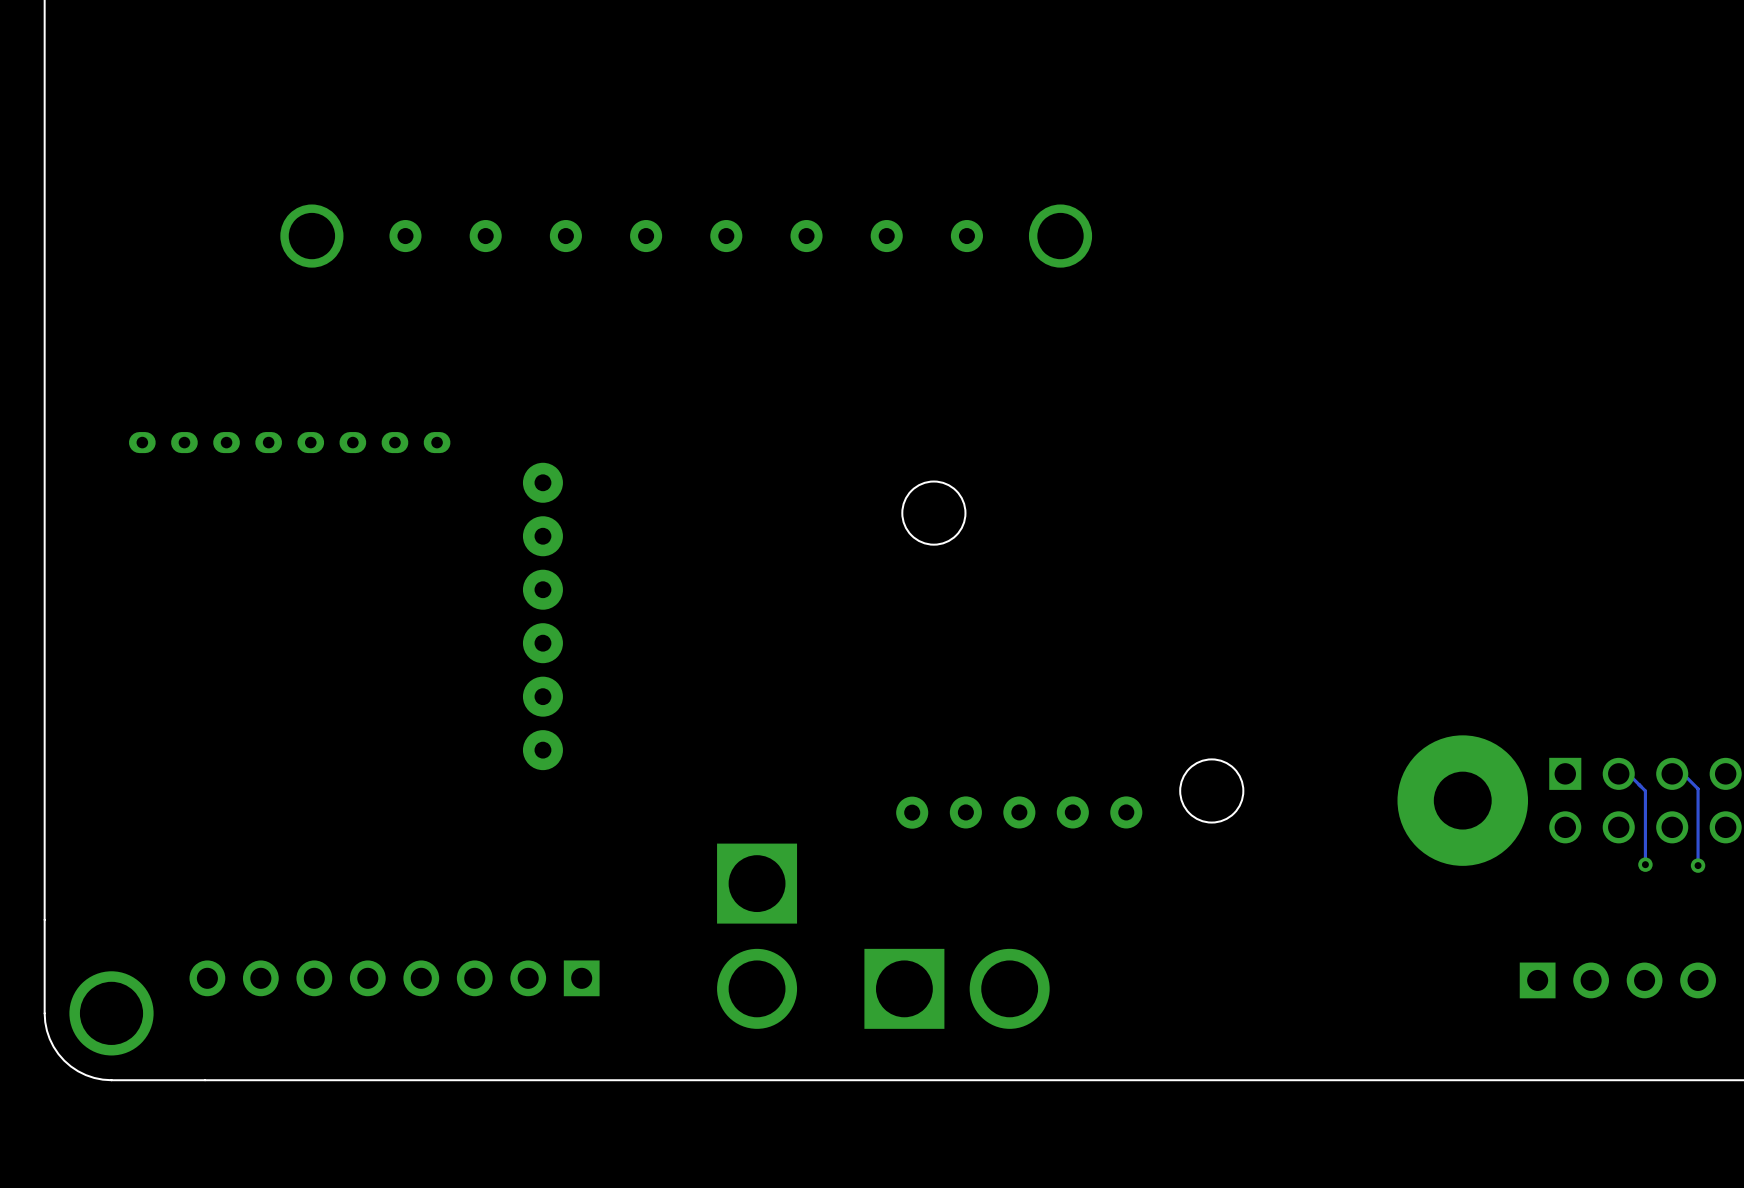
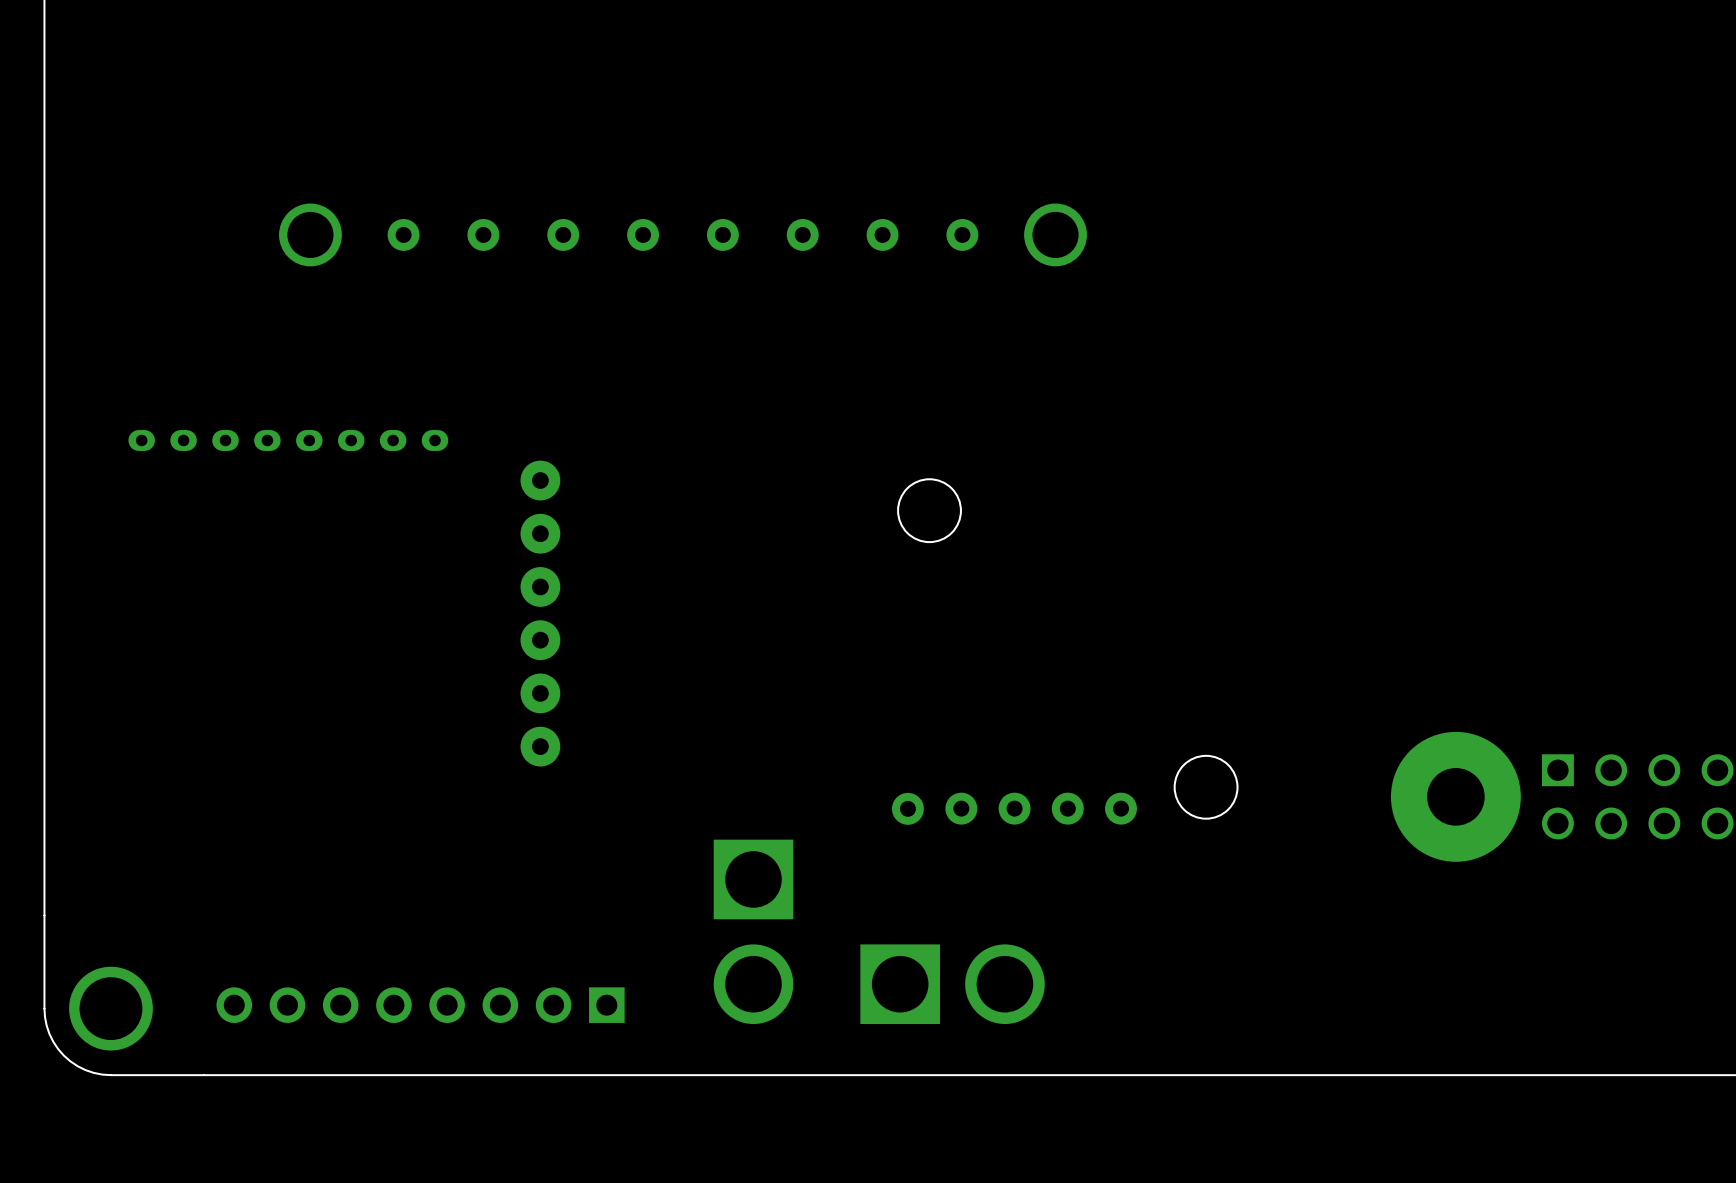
track: (1618, 773) (1628, 773) (1645, 790) (1645, 864) -> none
track: (1672, 773) (1683, 773) (1698, 788) (1698, 865) -> none
via: (1645, 864) -> none
via: (1698, 865) -> none
part position: (394, 978) -> (420, 1005)
part: (1617, 980) -> none

